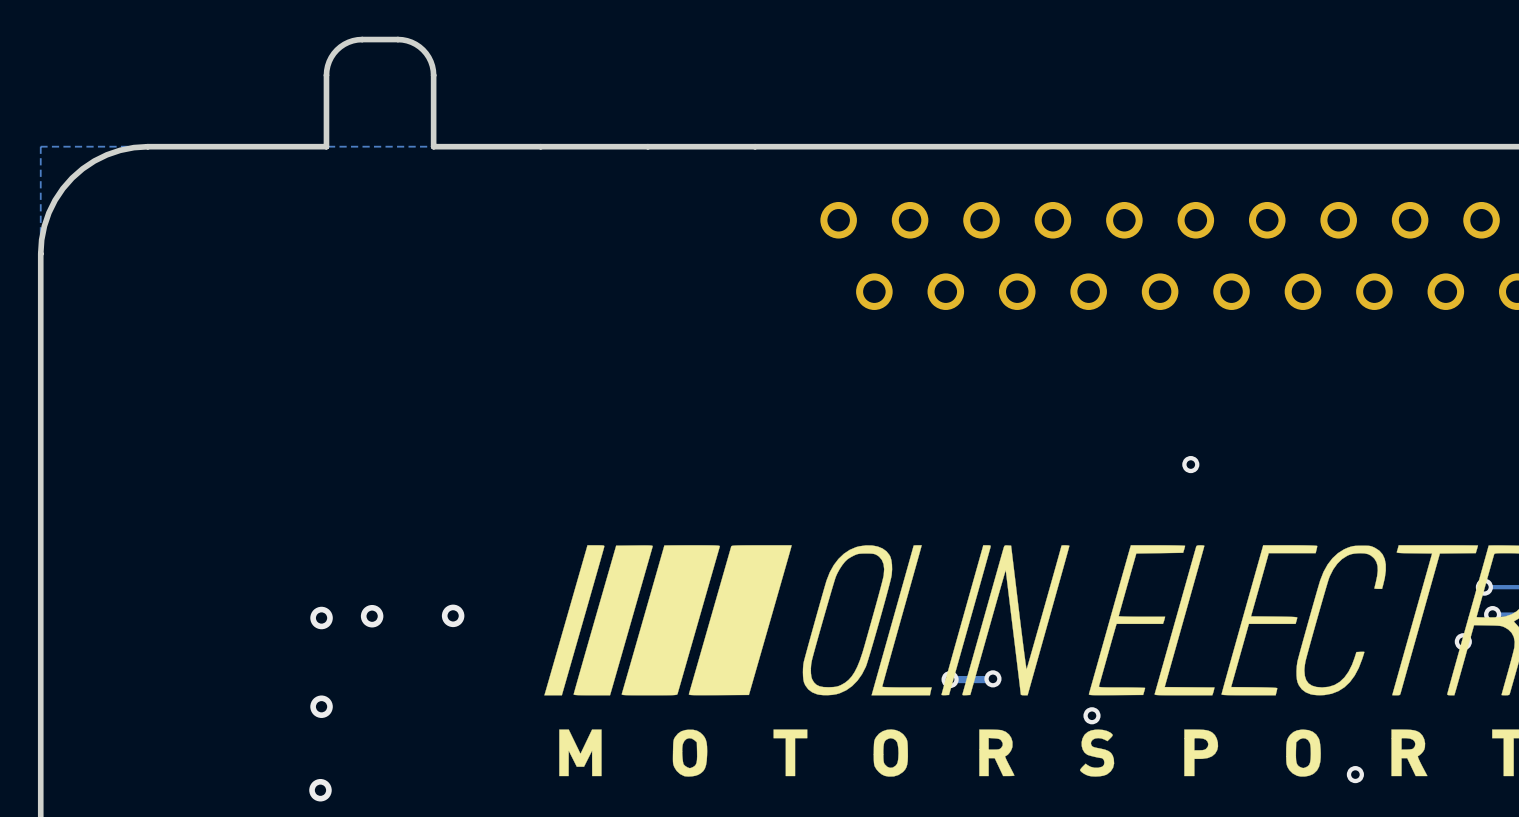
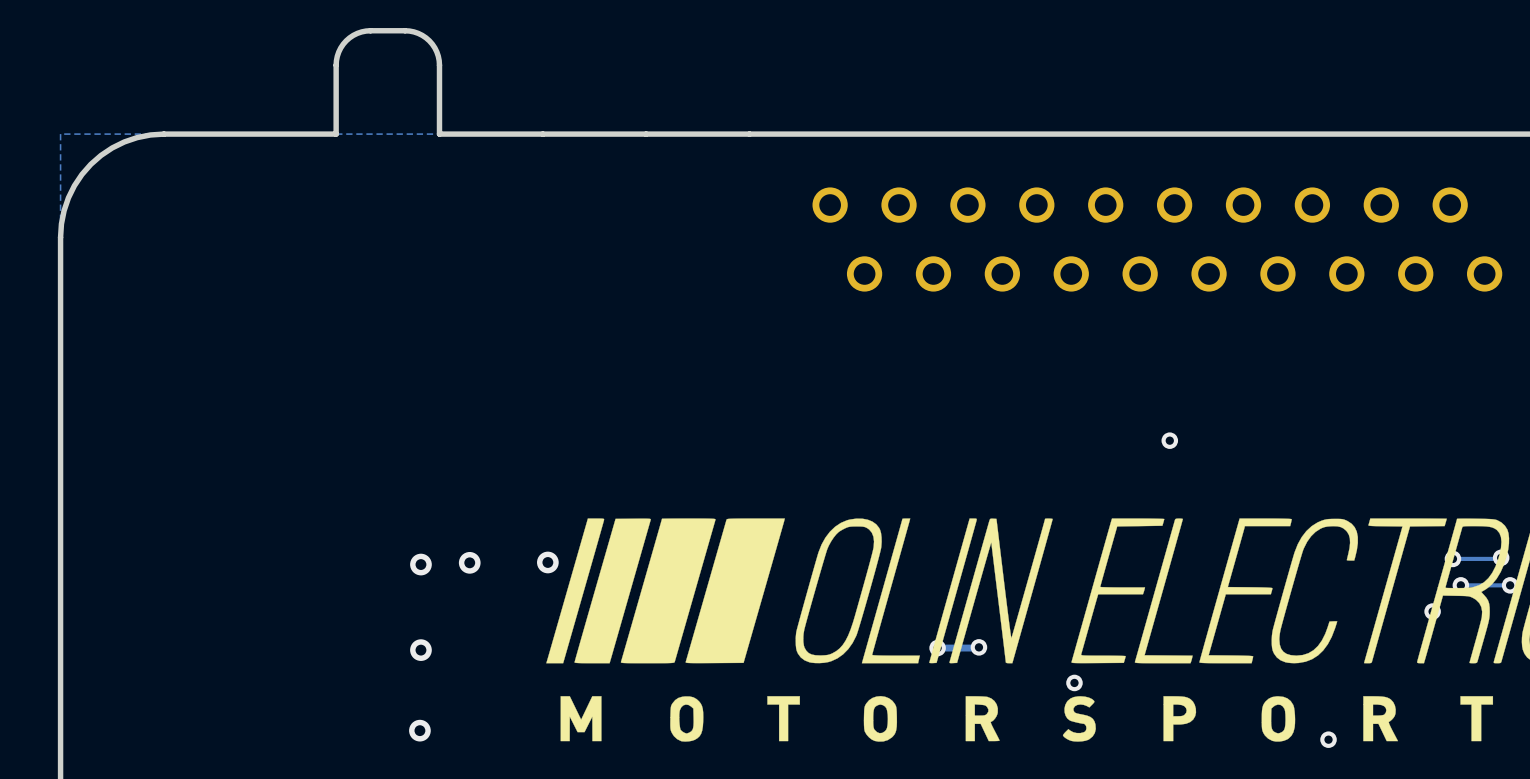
via: none -> (547, 562)
via: none -> (469, 562)
via: none -> (420, 564)
via: (453, 615) -> none
via: (372, 616) -> none
via: (321, 618) -> none
via: none -> (420, 650)
via: (321, 706) -> none
via: none -> (419, 730)
via: (320, 790) -> none

